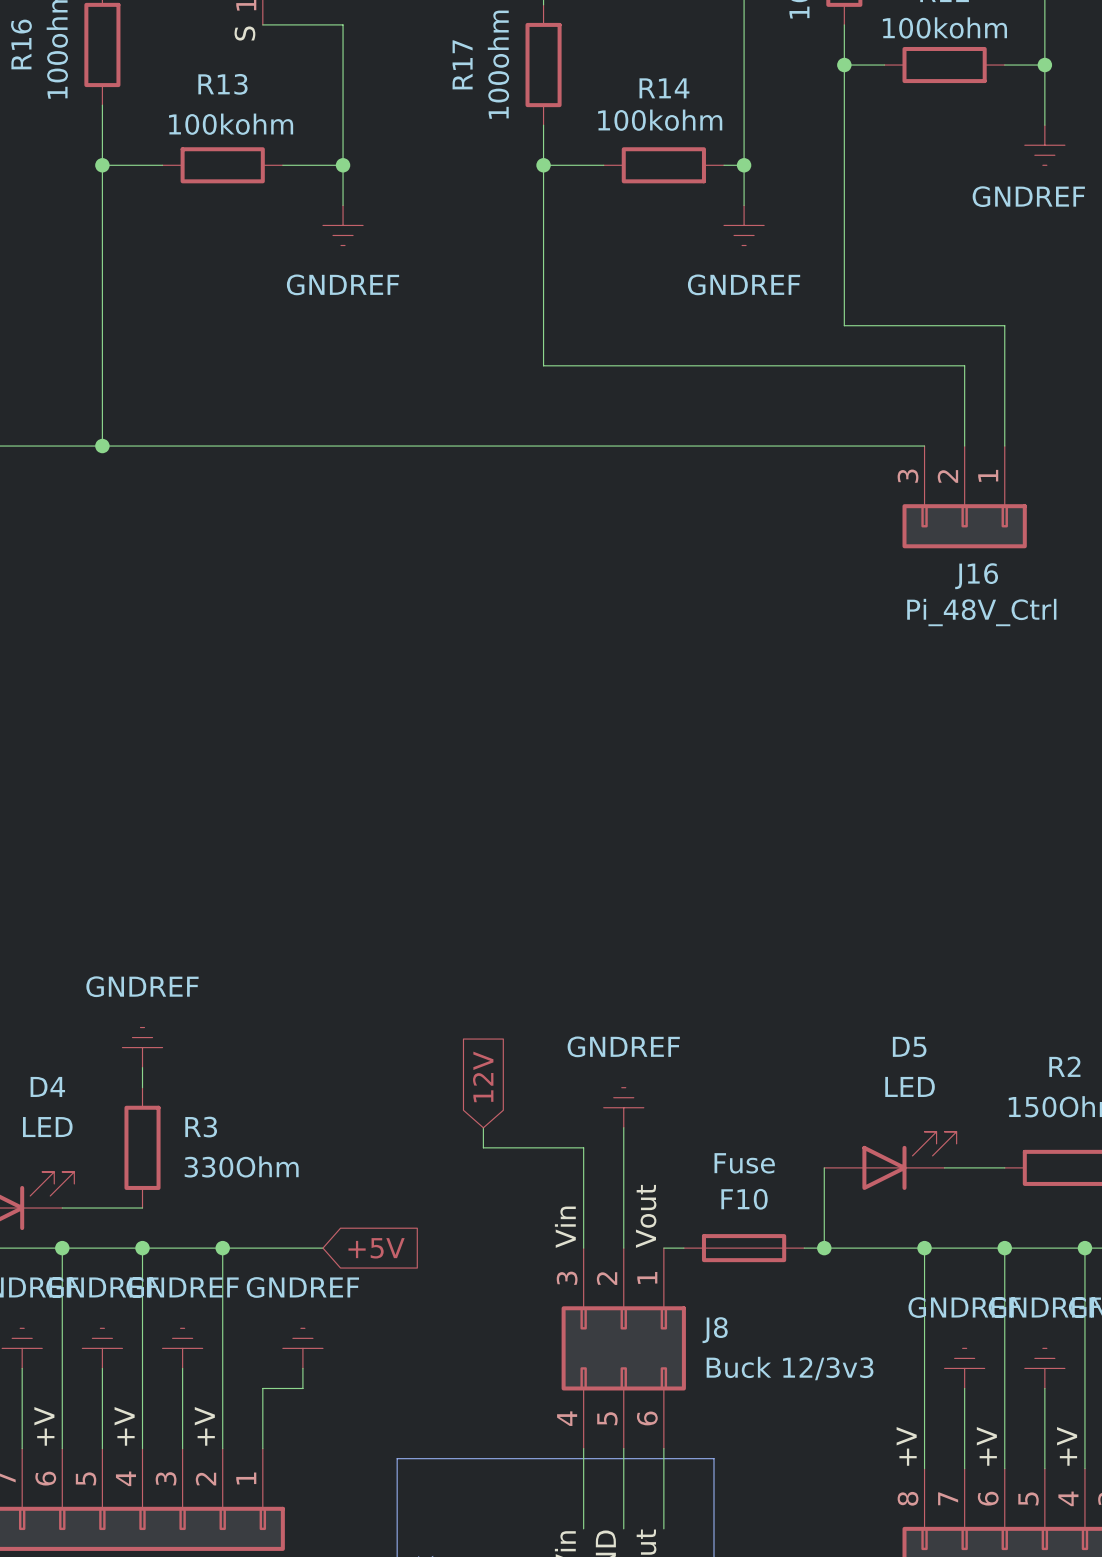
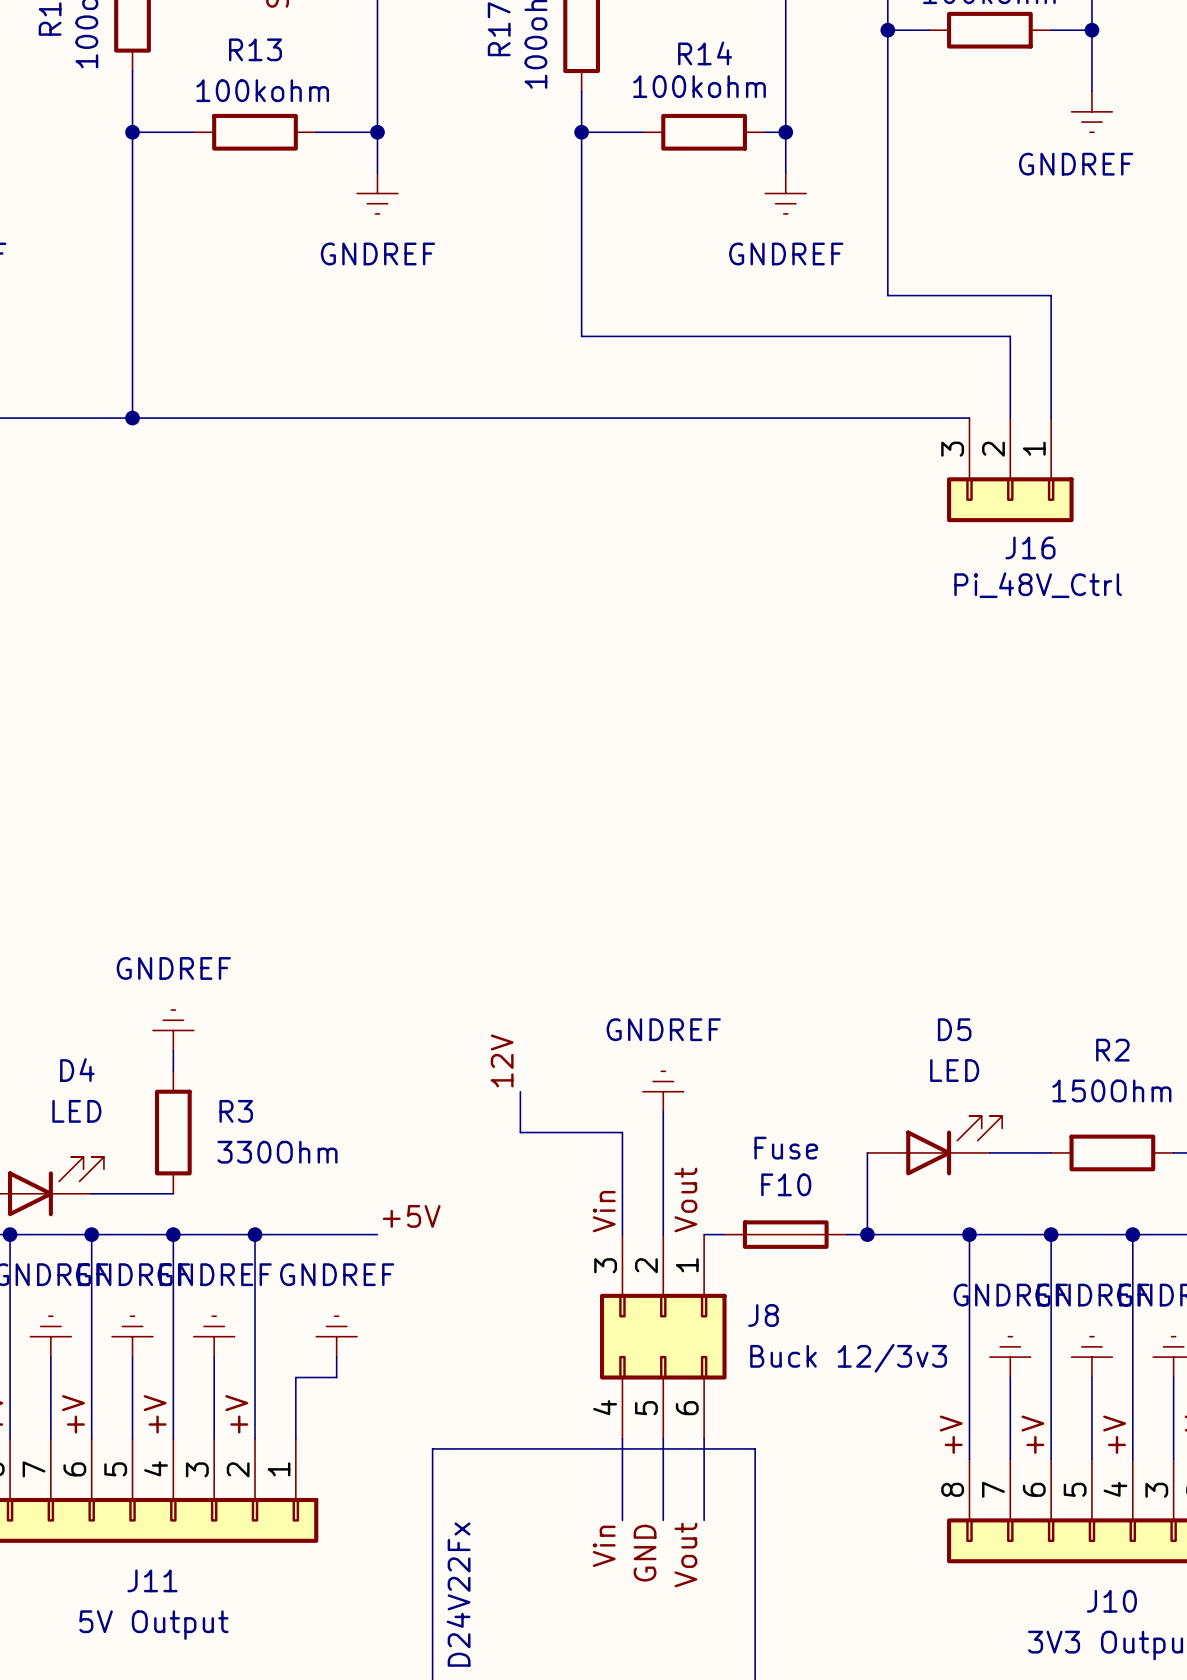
global label: 12V (483, 1076) -> none
label: none -> 12V (502, 1060)
wire: none -> (520, 1091) (520, 1112)
label: none -> +5V (411, 1216)
wire: none -> (357, 1234) (377, 1234)
global label: +5V (376, 1248) -> none

